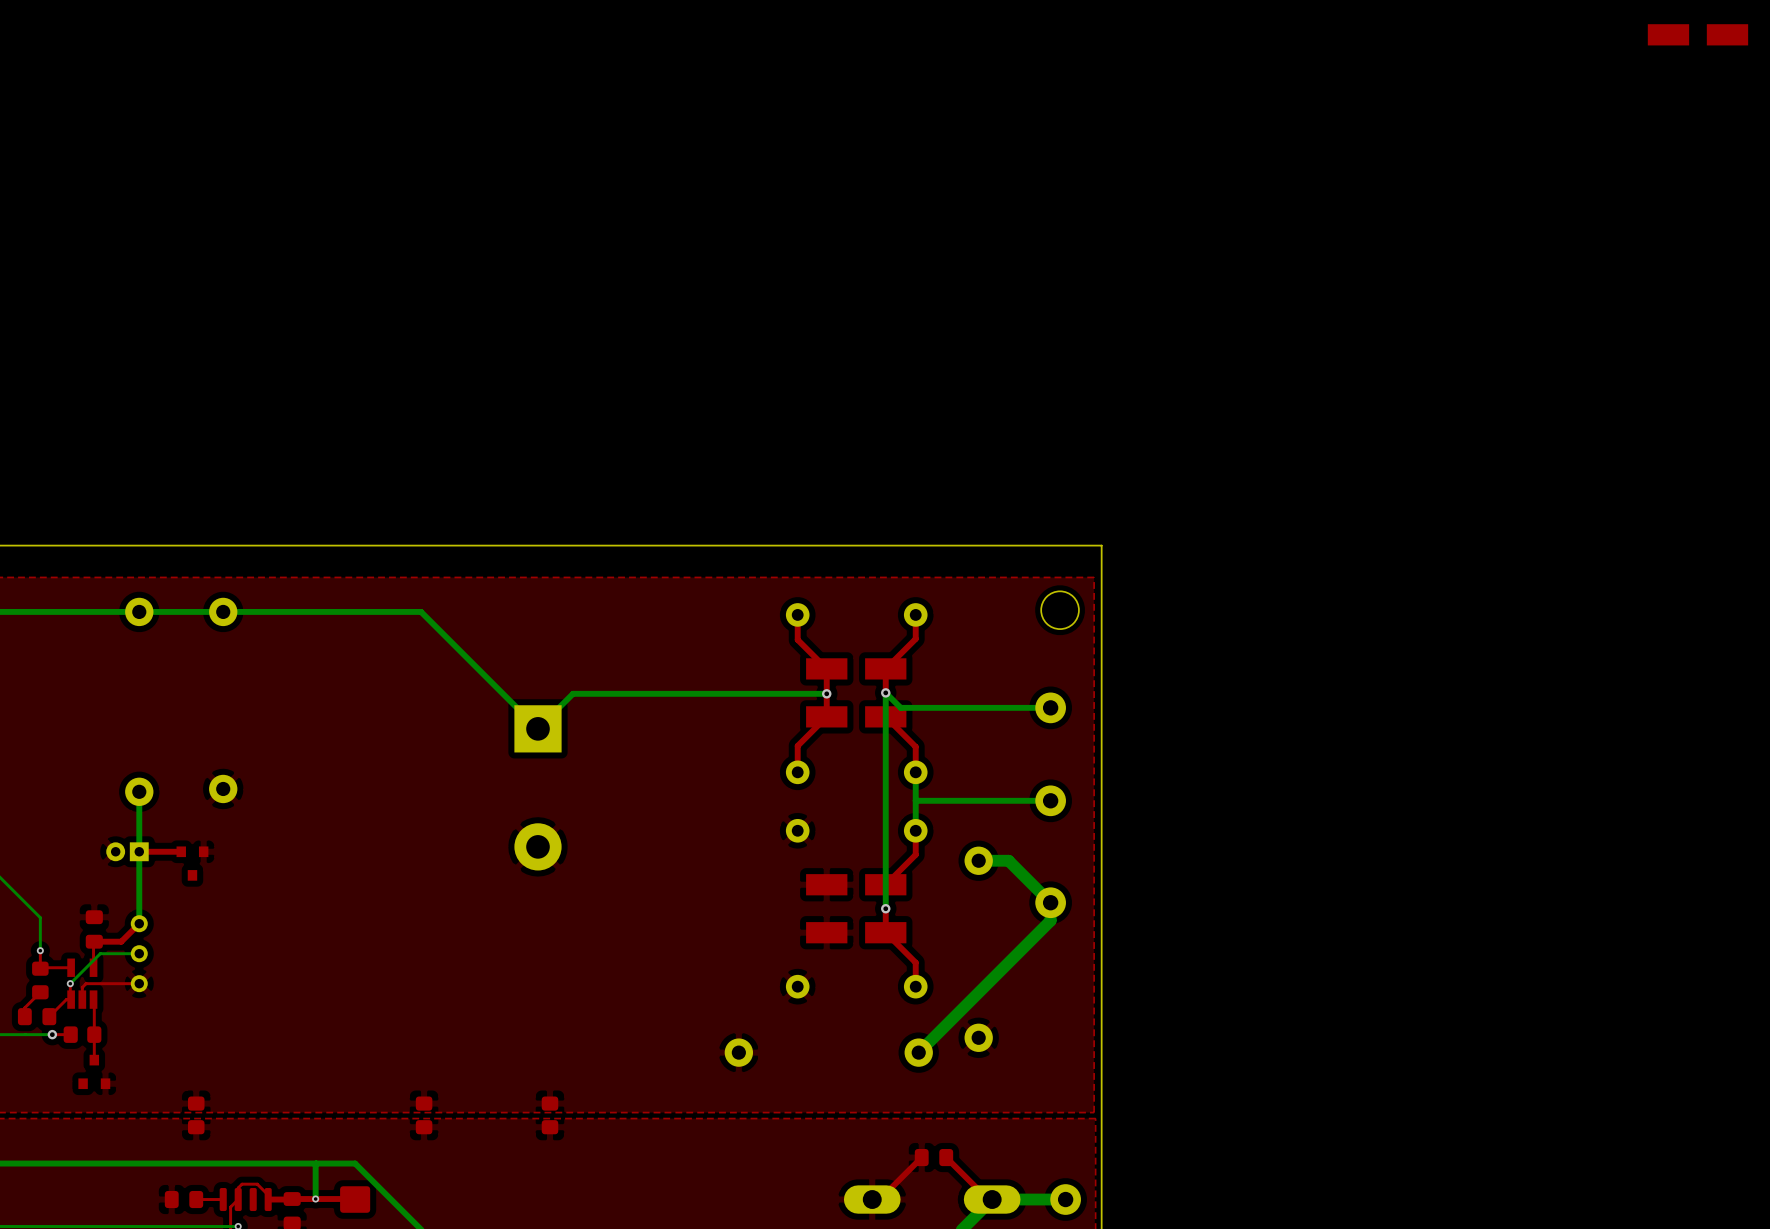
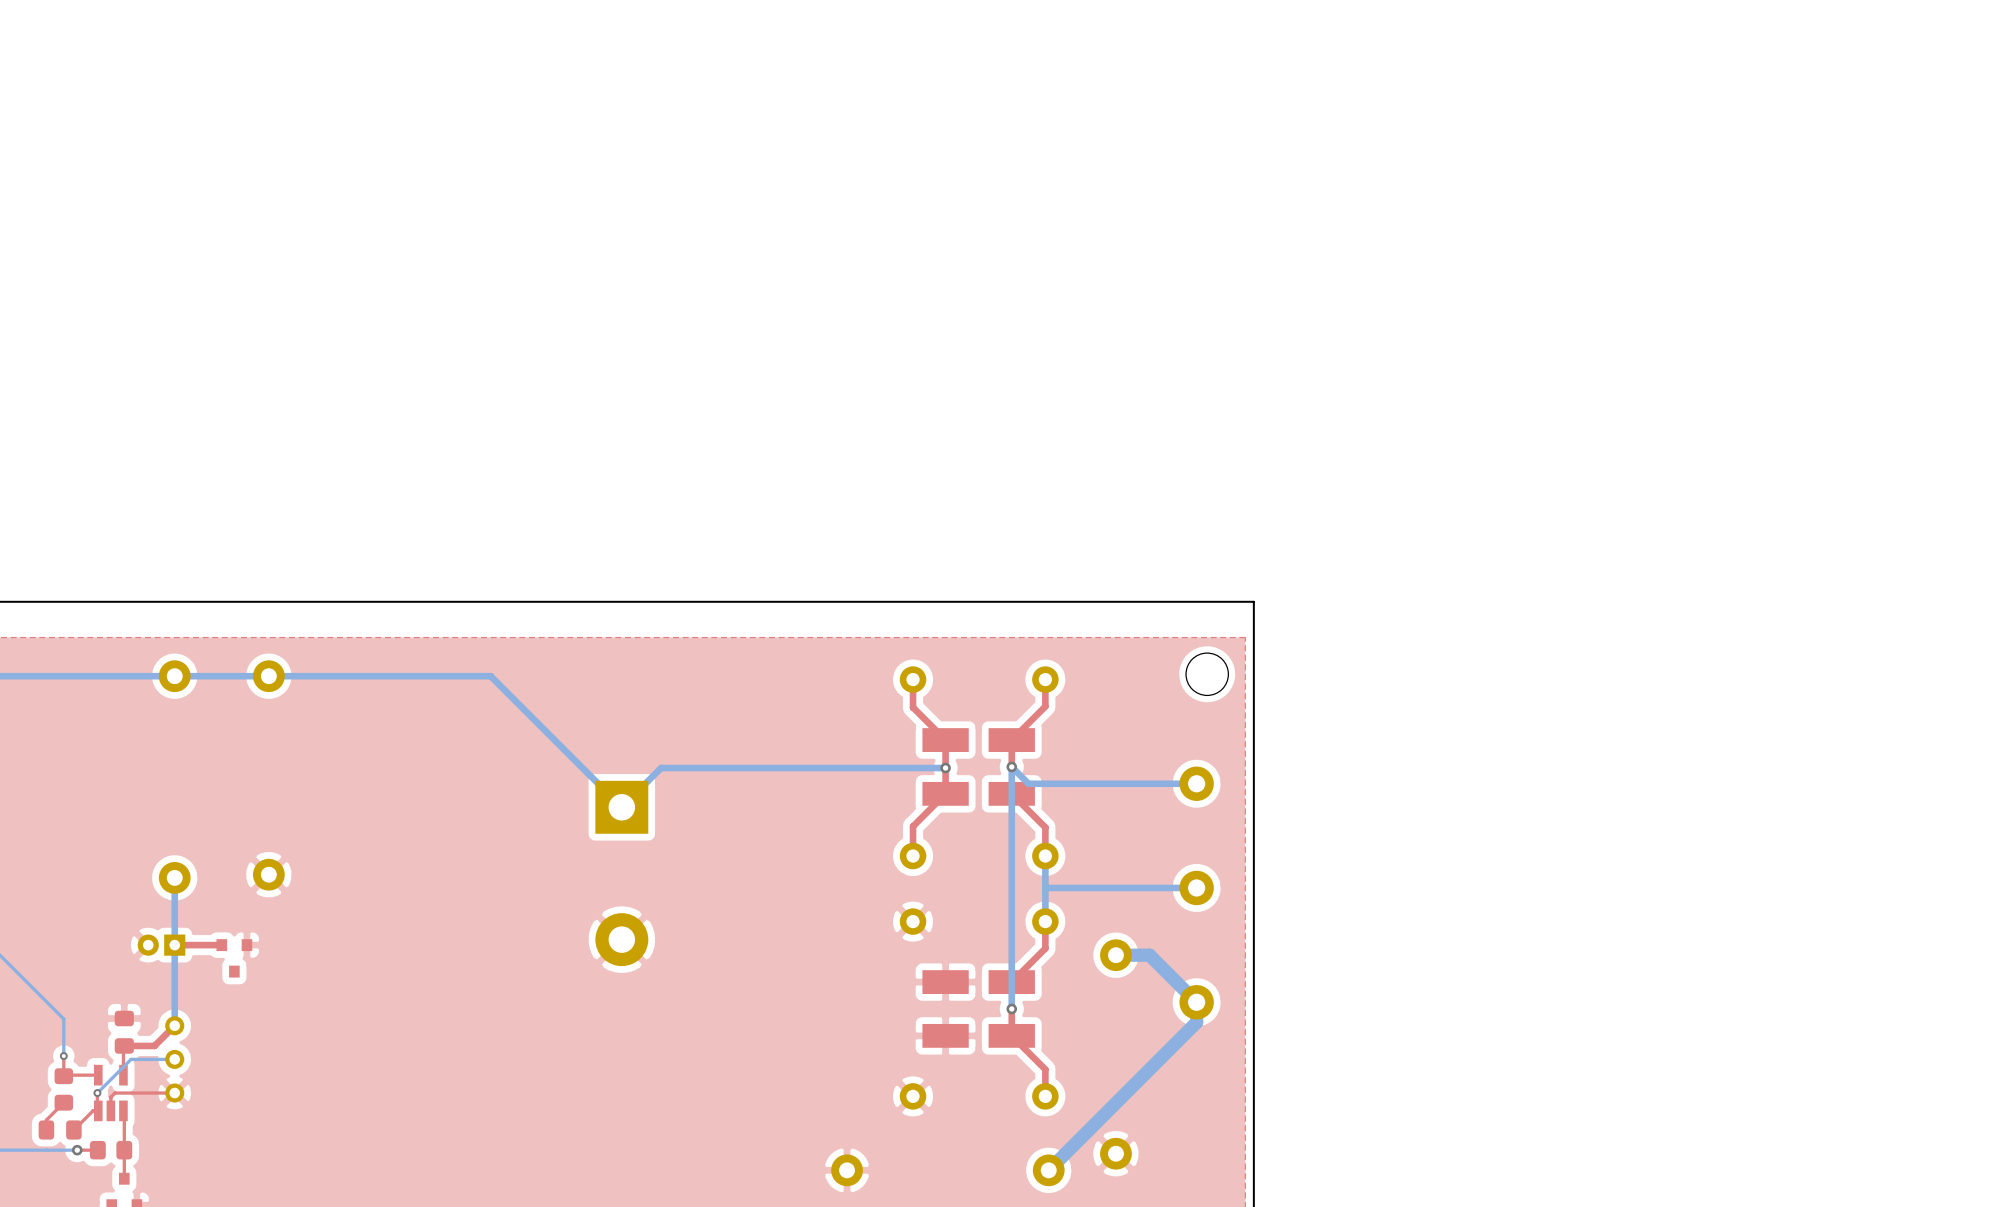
part: (1697, 34) -> none

